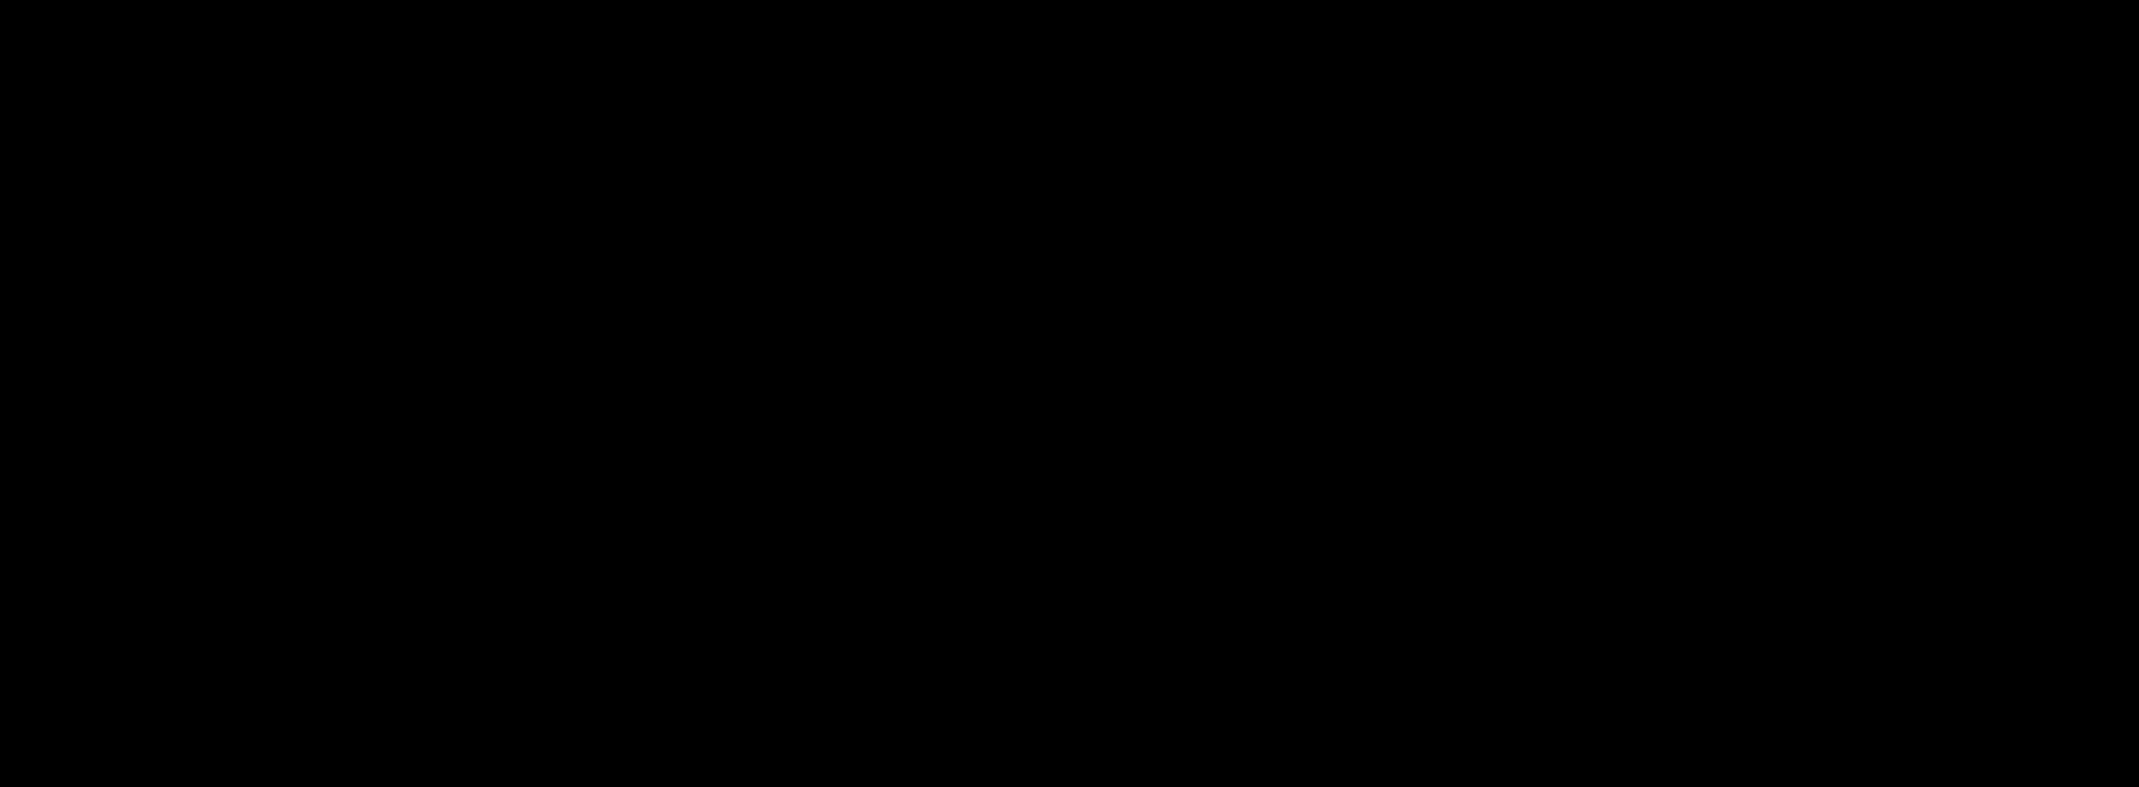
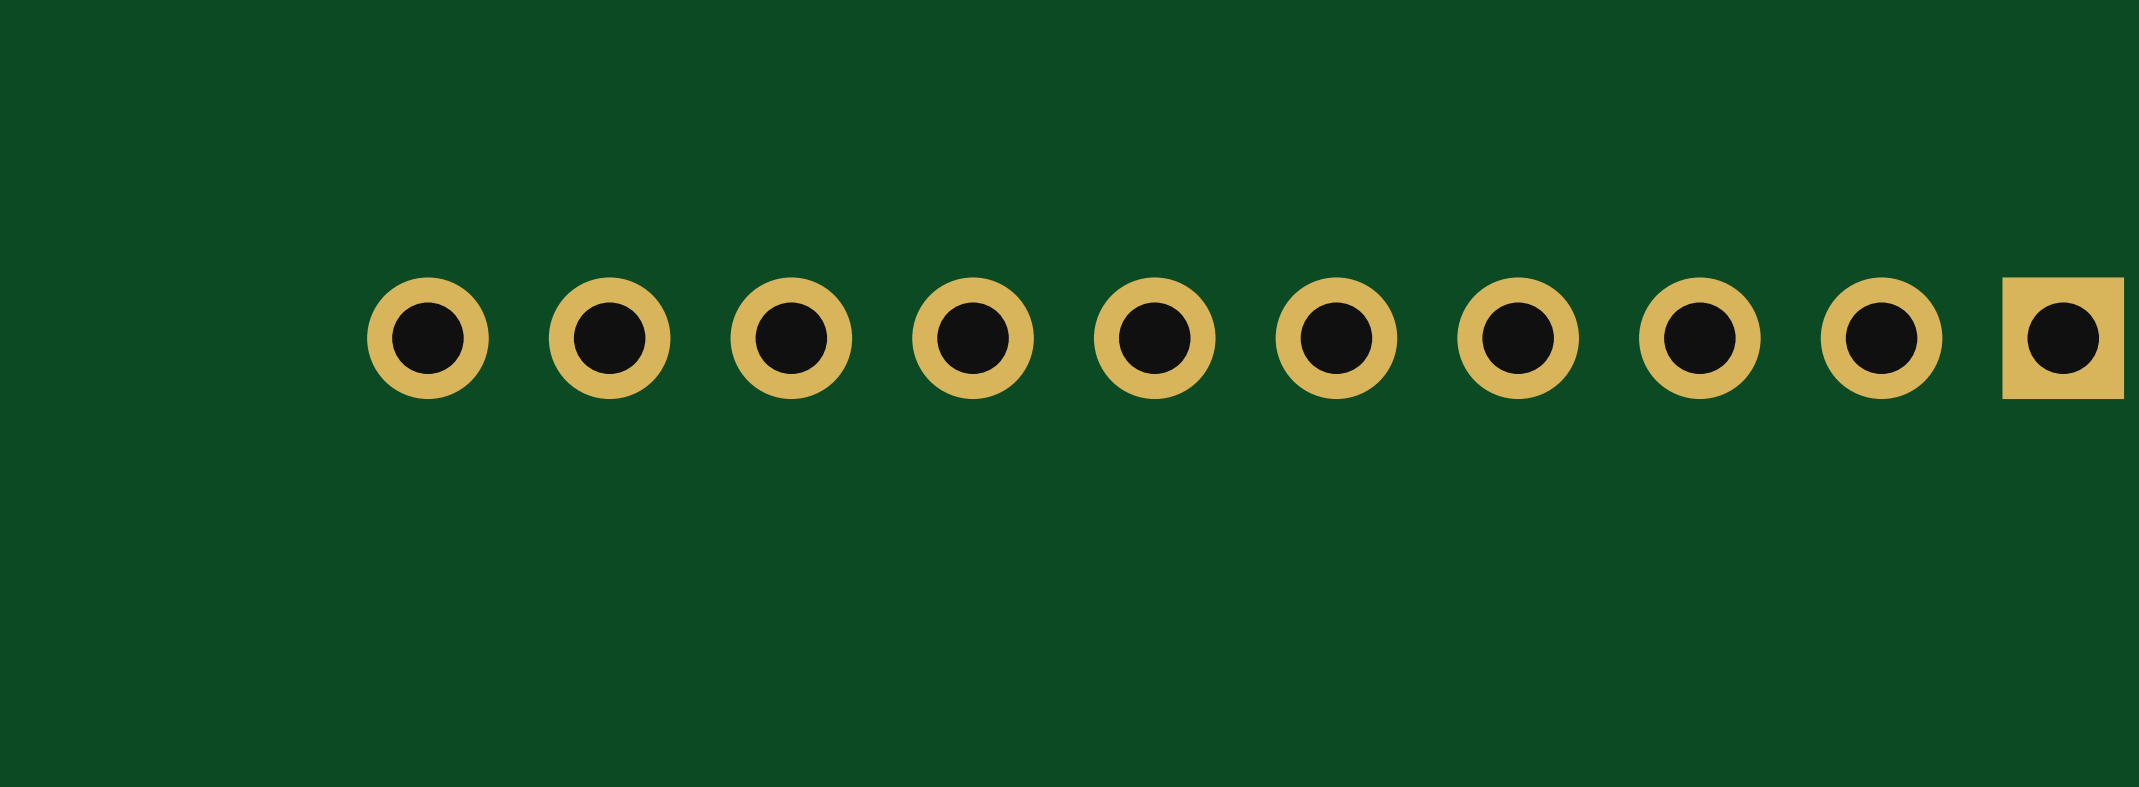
part: none -> (1245, 338)

